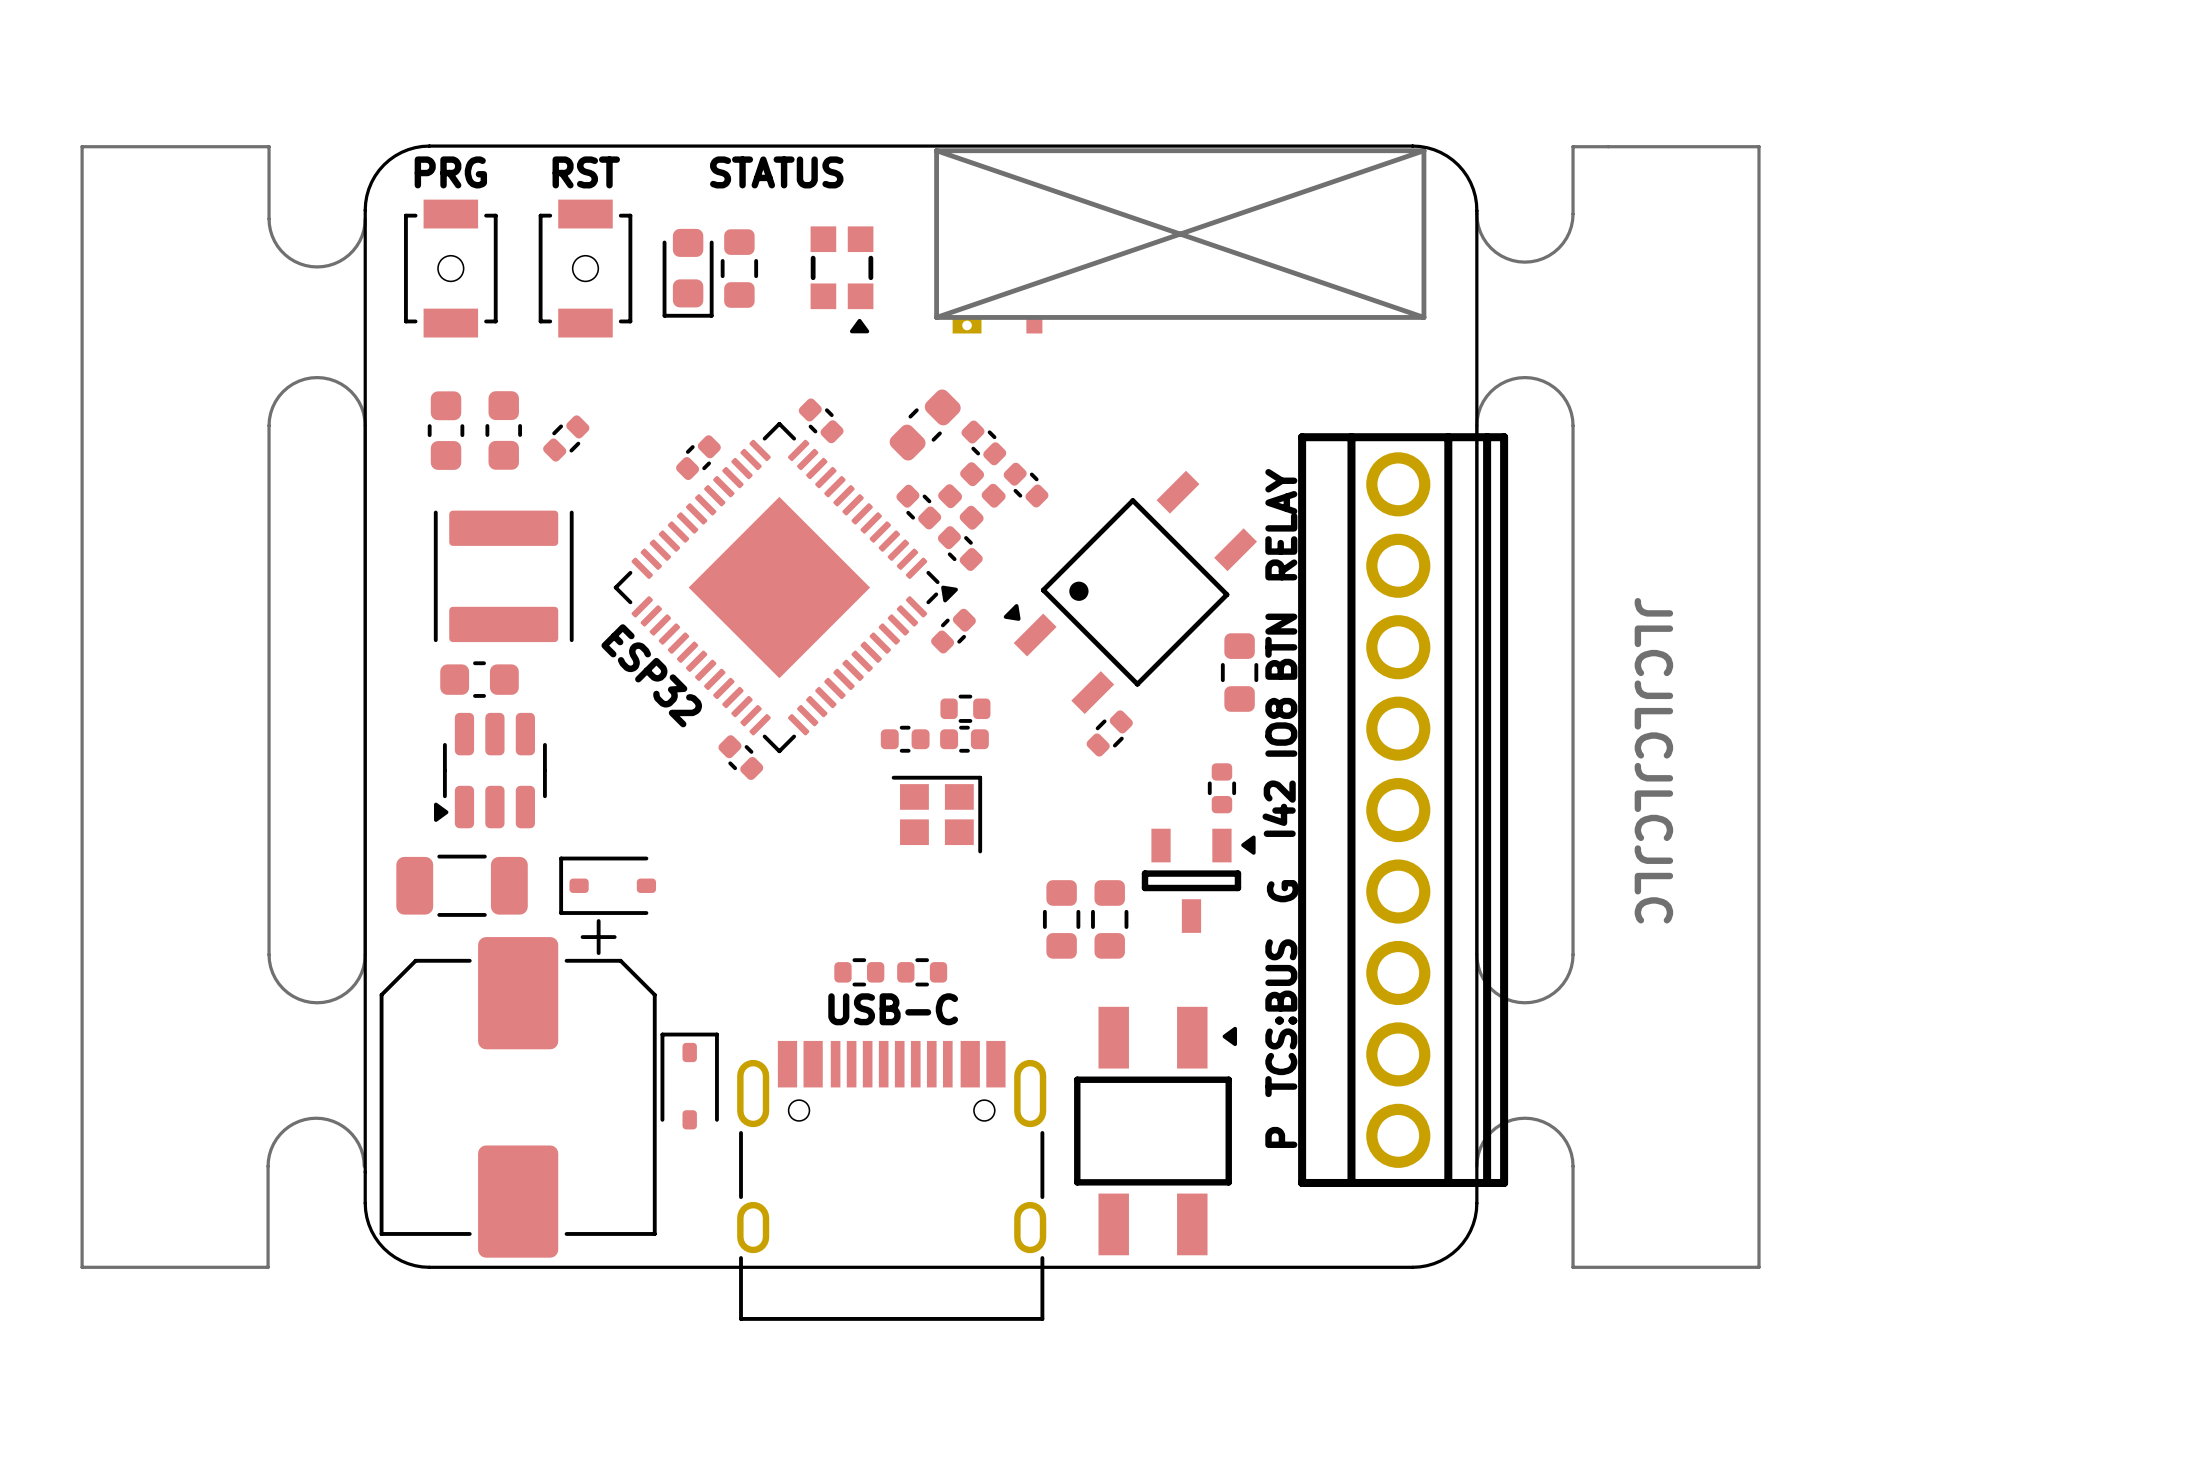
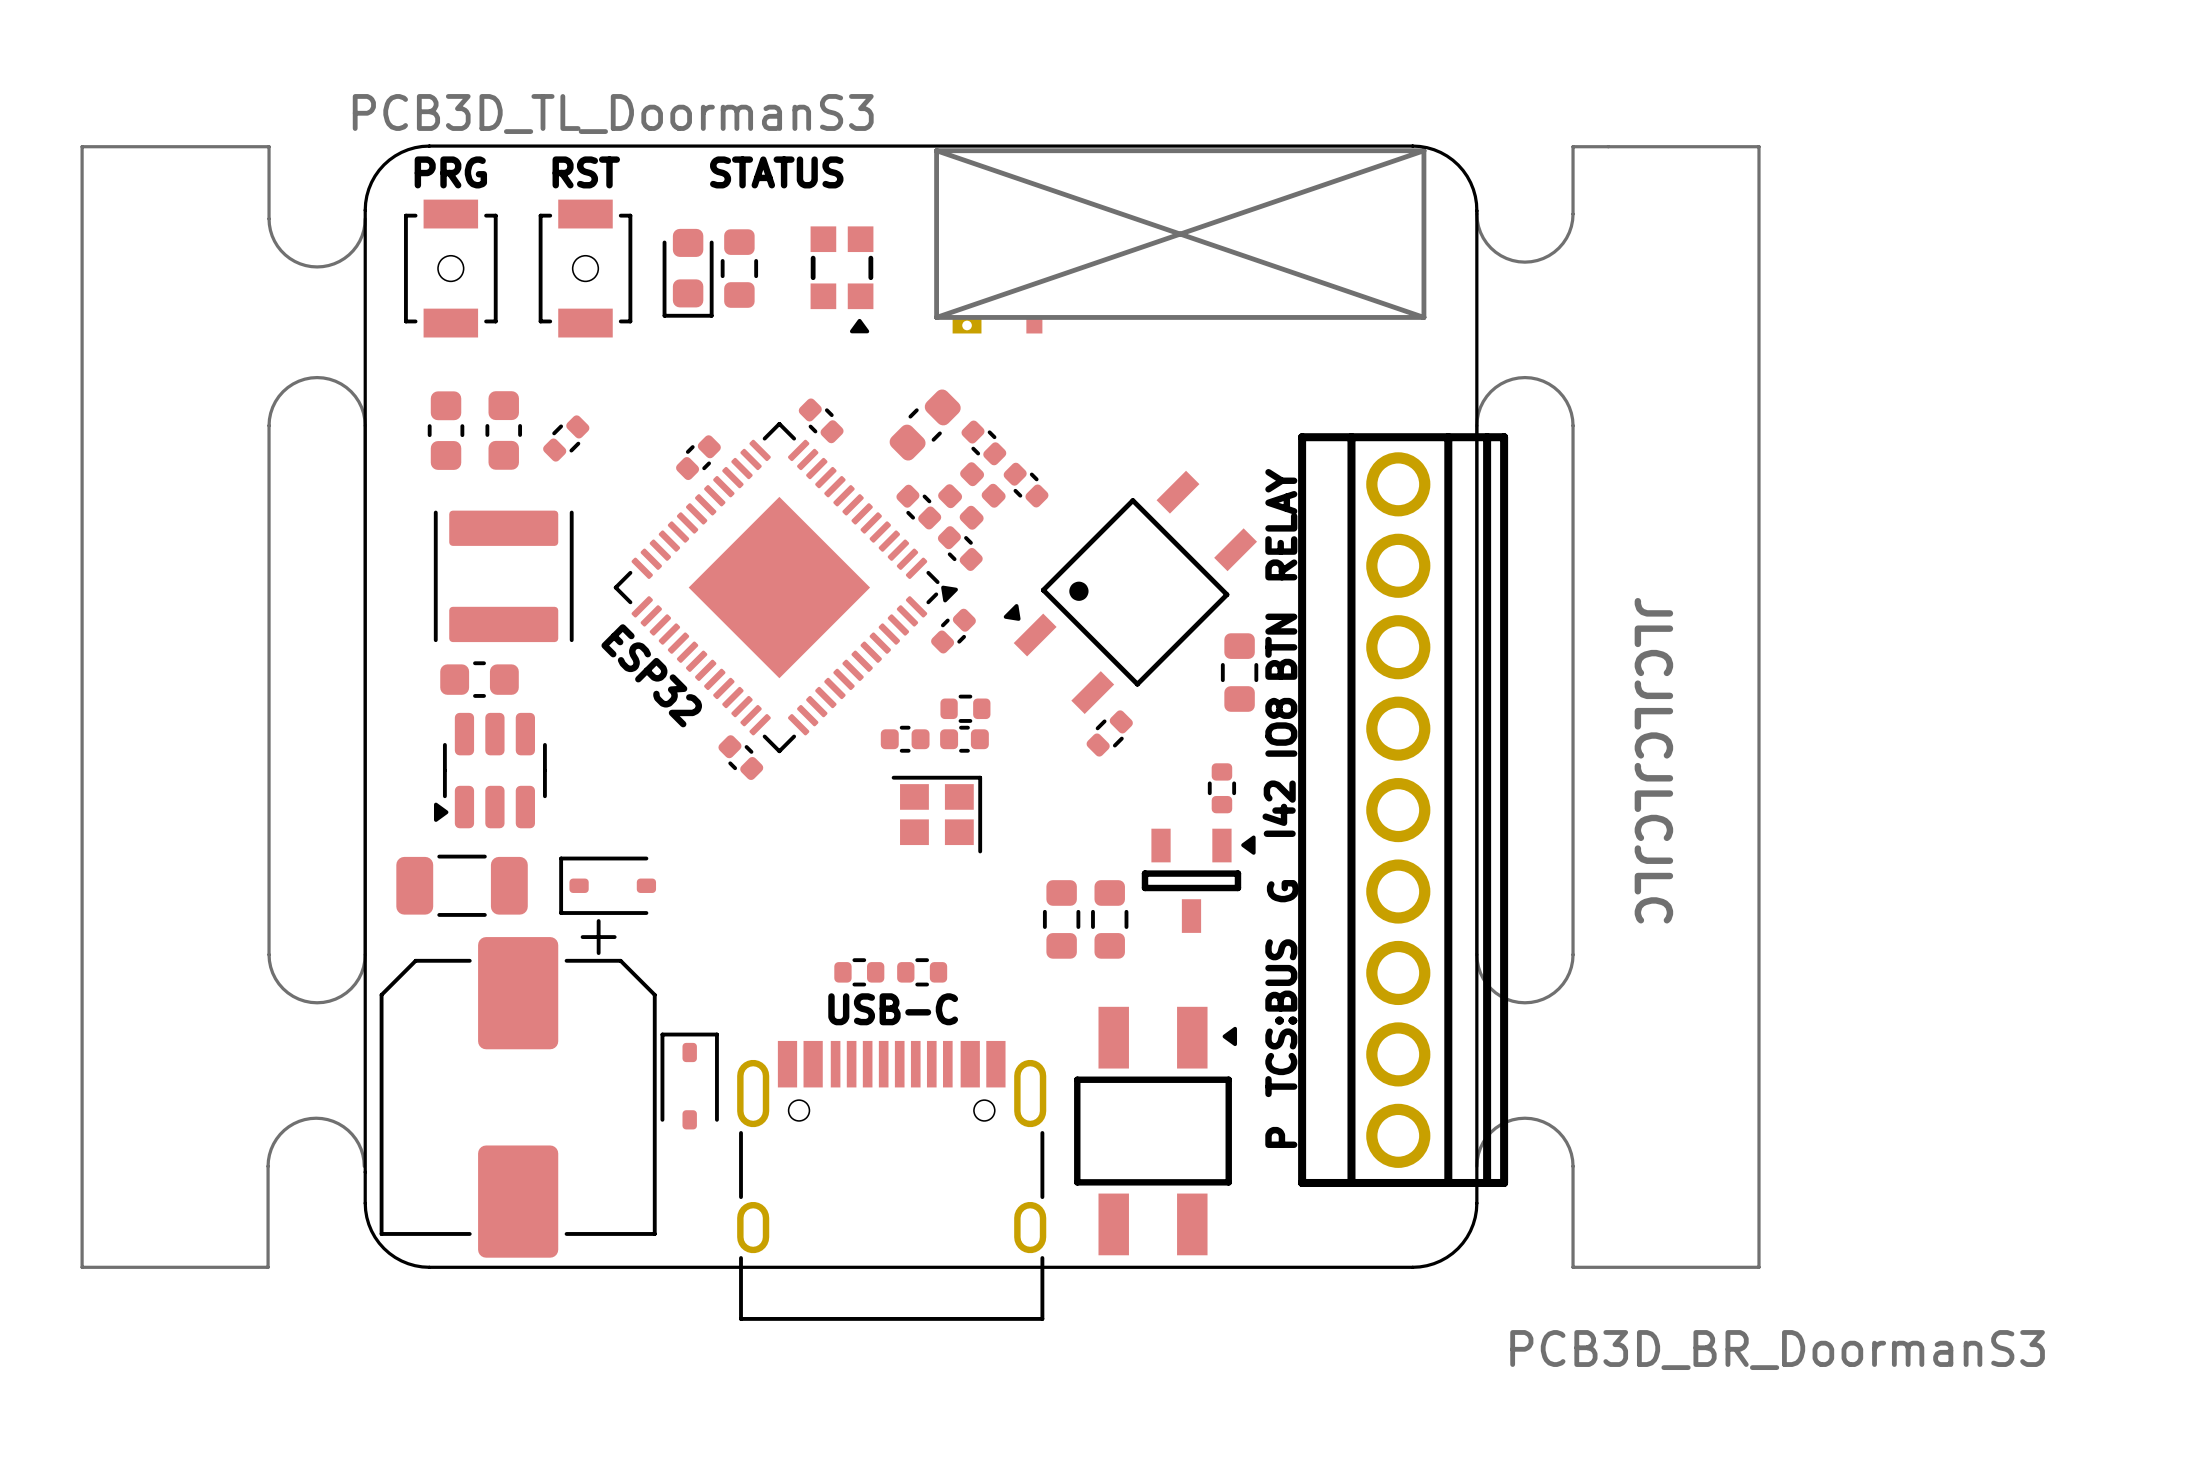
text: none -> PCB3D_TL_DoormanS3 (613, 114)
text: none -> PCB3D_BR_DoormanS3 (1777, 1350)

